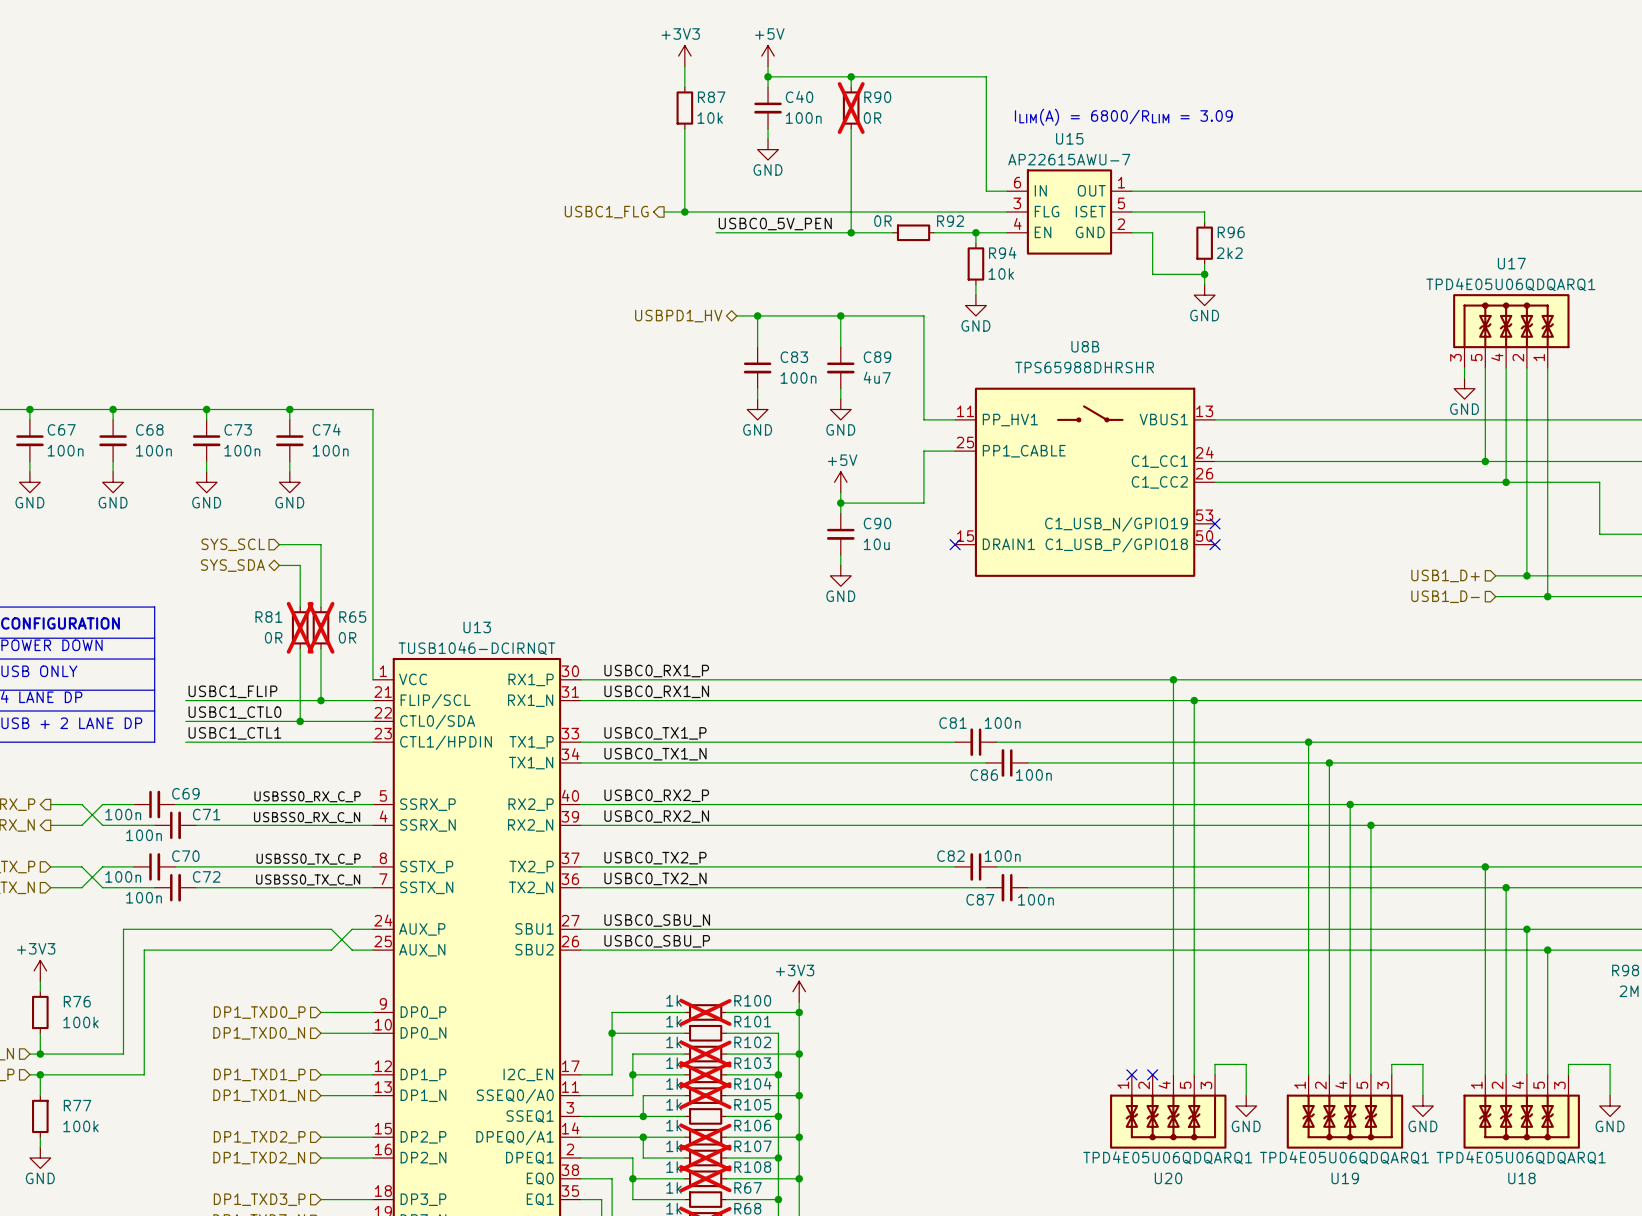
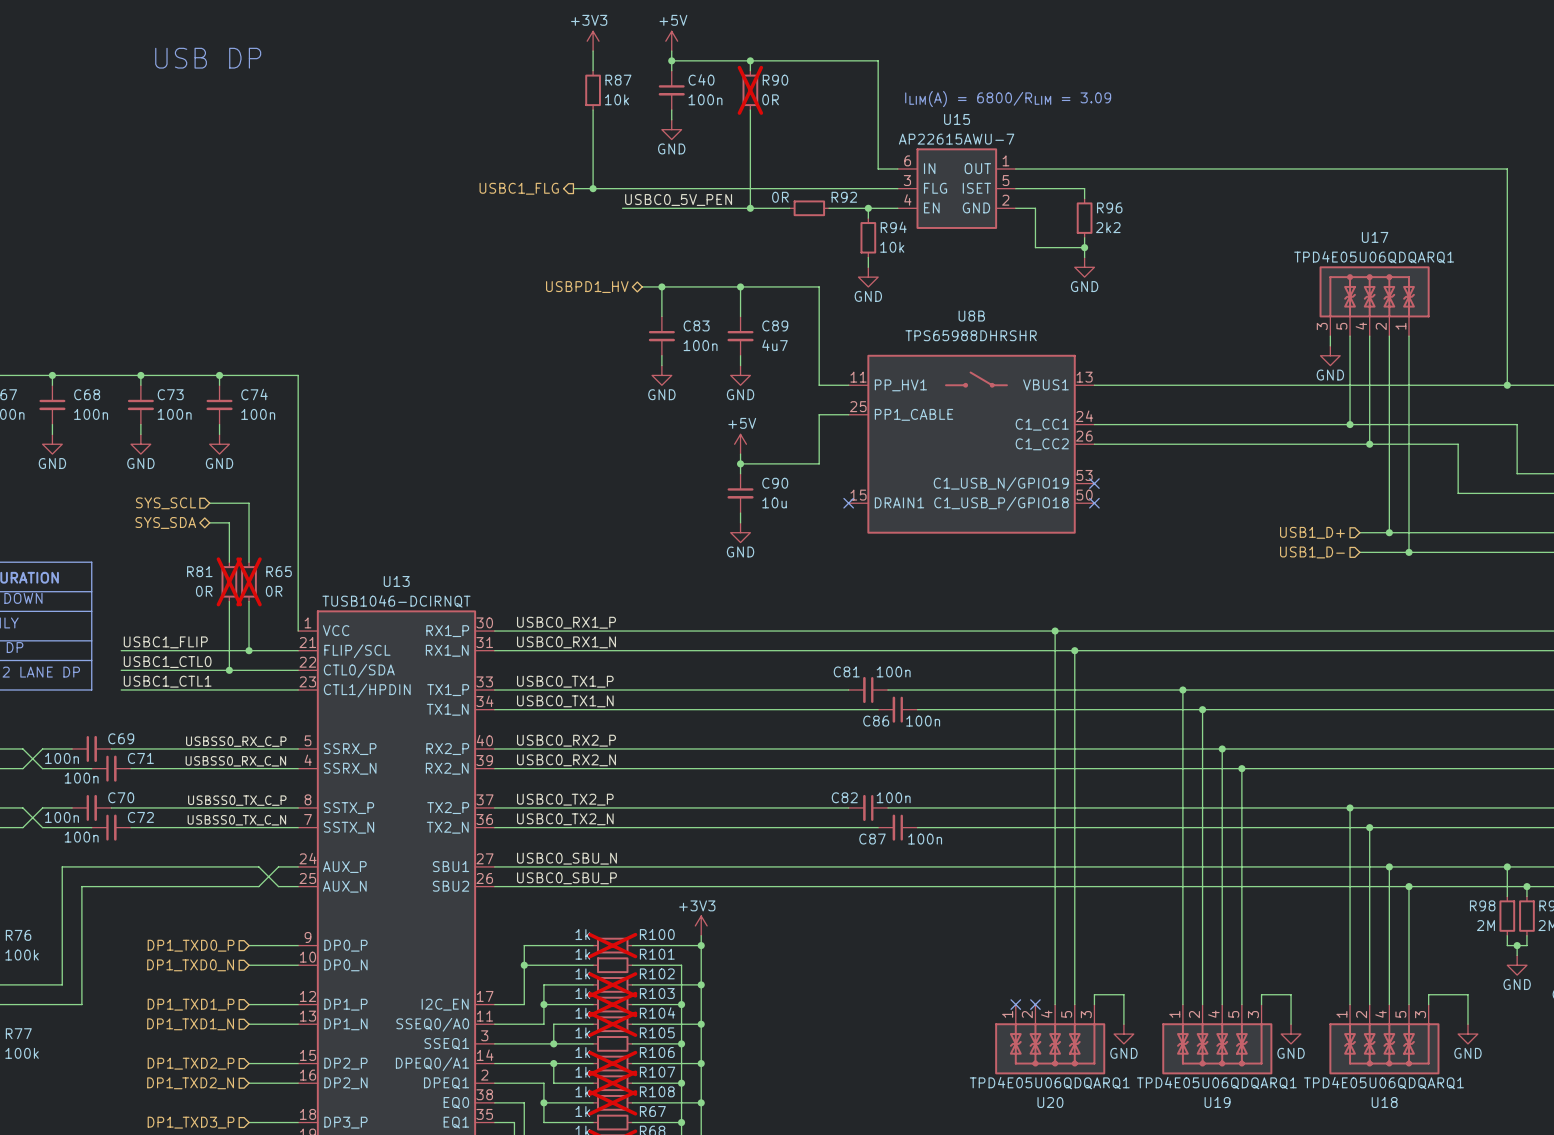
text: none -> USB DP (208, 58)

